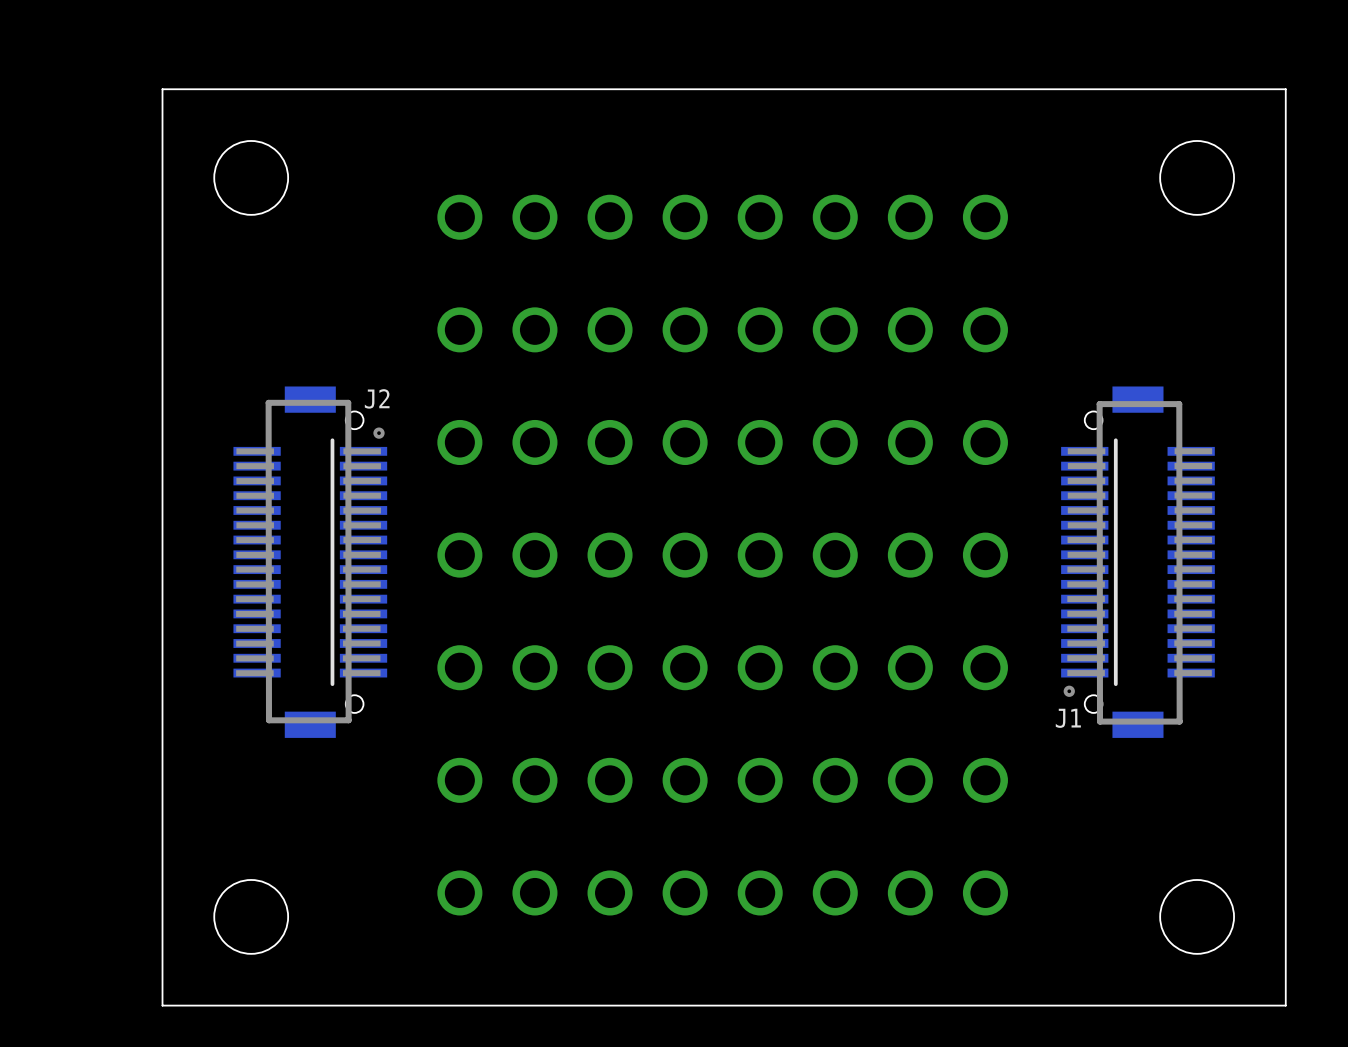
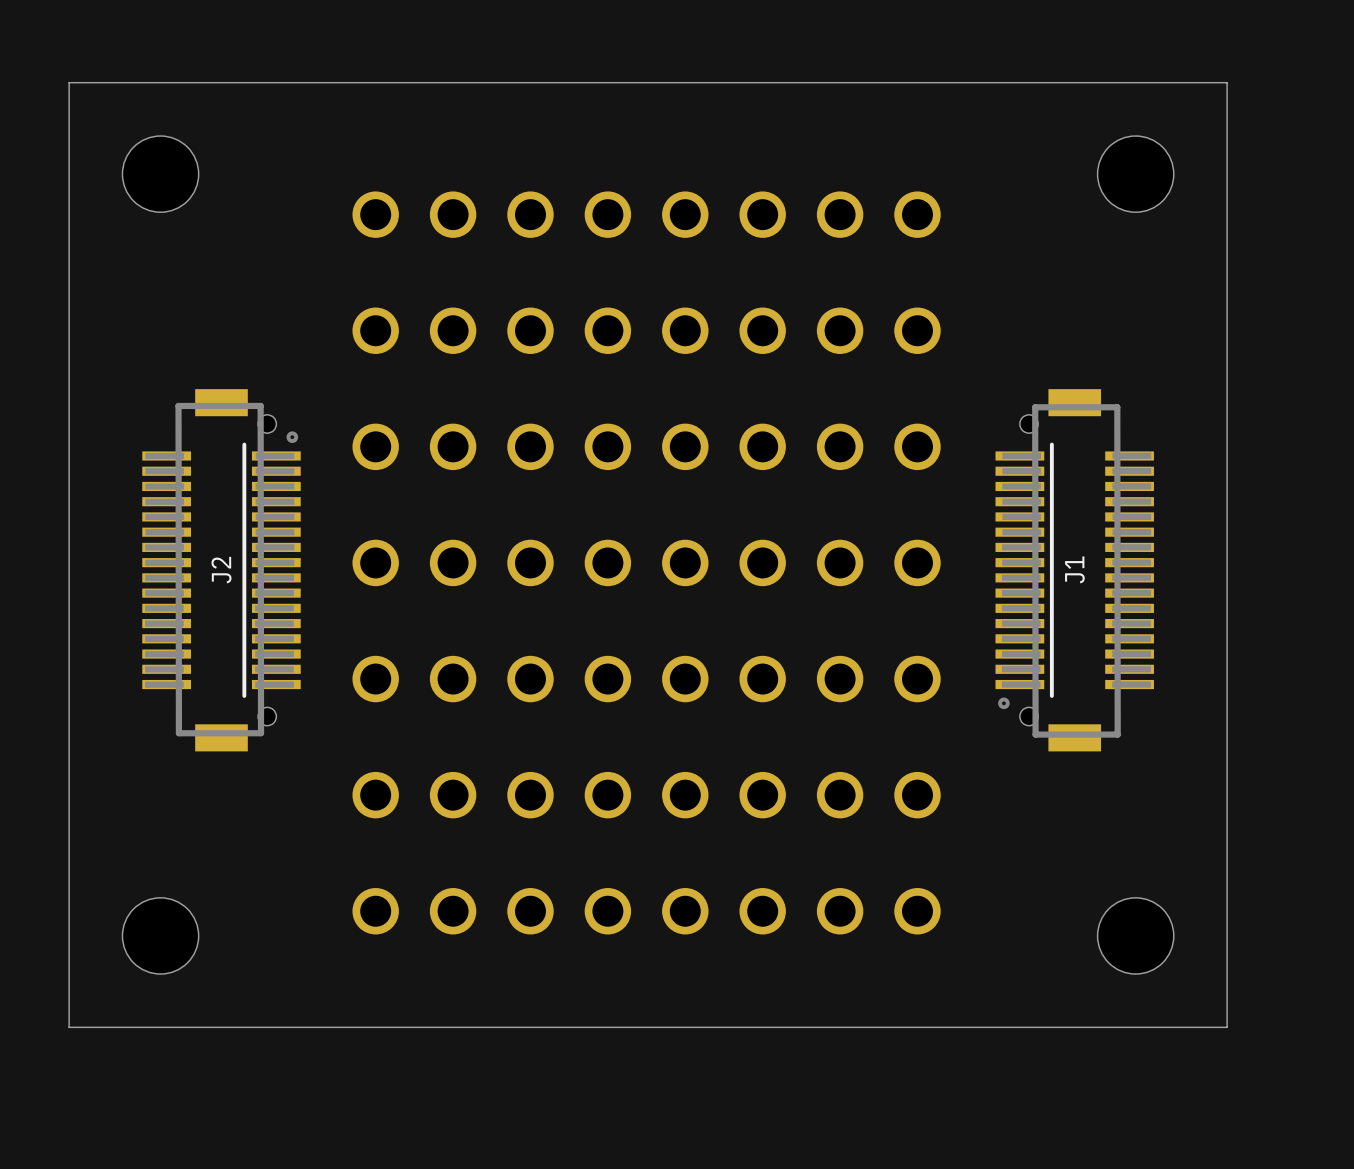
J2 name rotation: 0° (377, 398) -> 90° counterclockwise (221, 570)
J2 name position: J2 (377, 398) -> J2 (221, 570)
J1 name rotation: 0° (1068, 718) -> 90° counterclockwise (1074, 569)
J1 name position: J1 (1068, 718) -> J1 (1074, 569)

